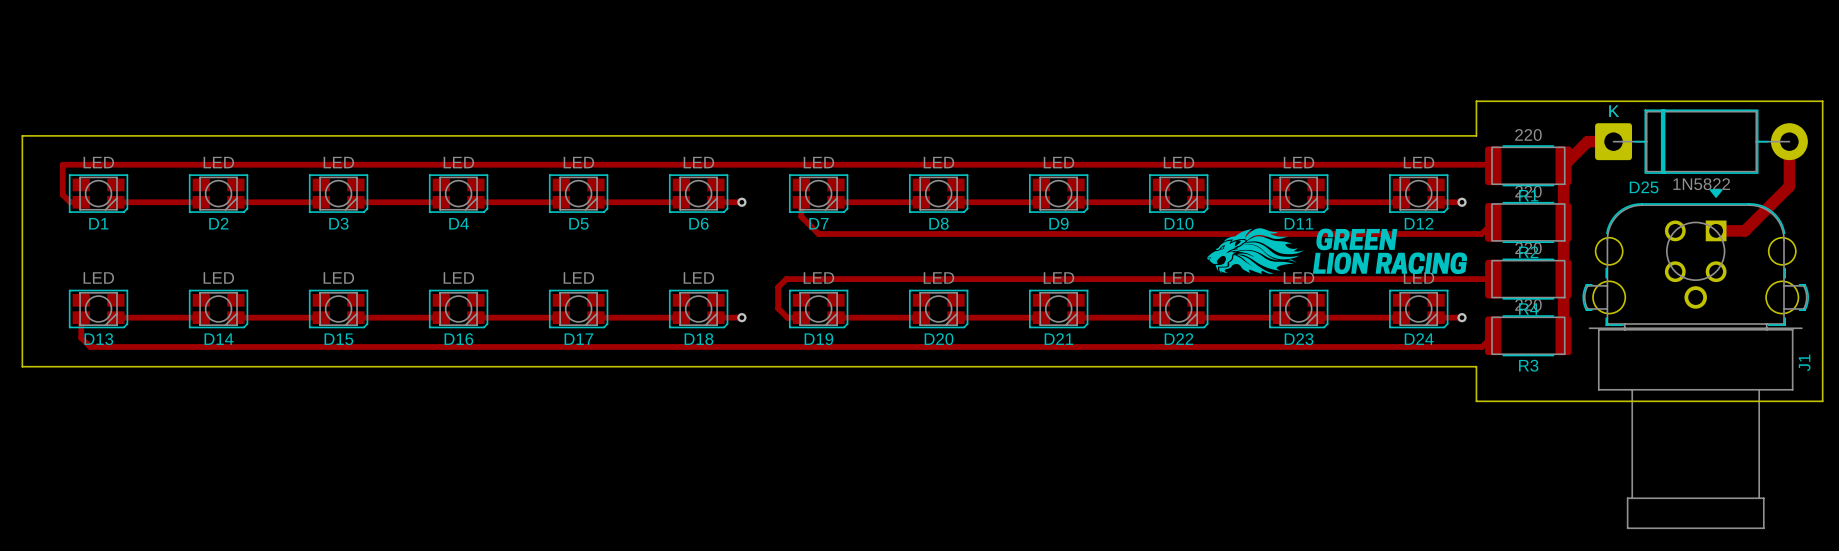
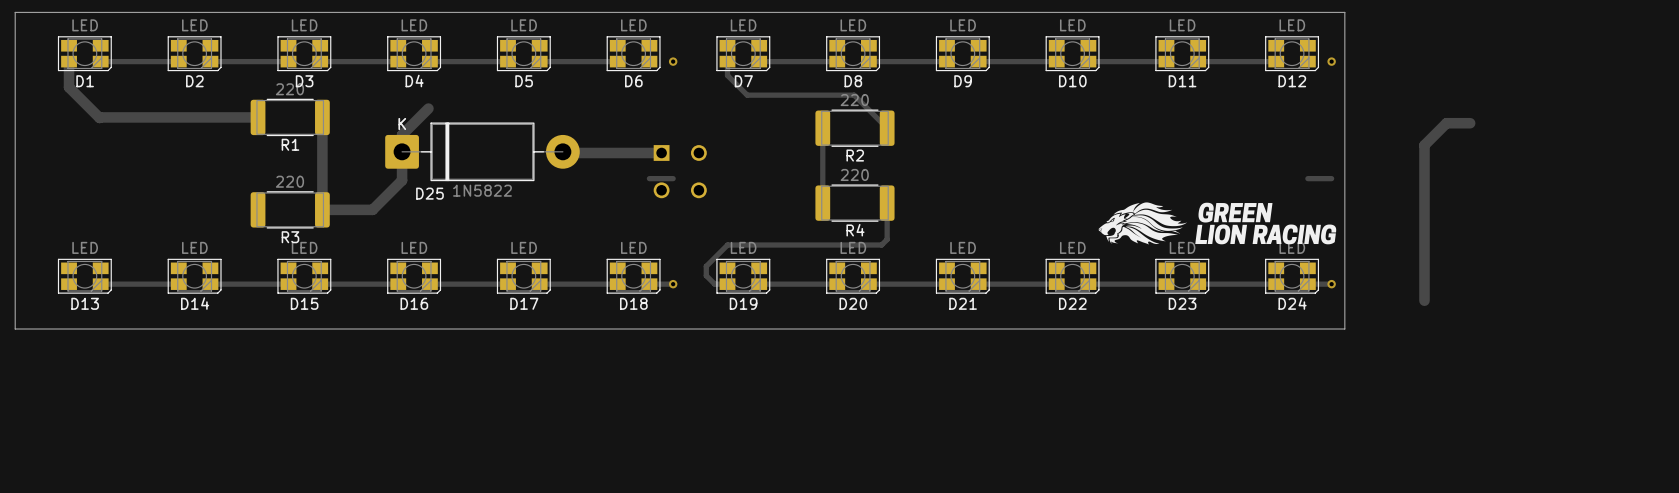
track: none -> (69, 61) (69, 87) (99, 117) (258, 117)
via: none -> (673, 61)
track: none -> (727, 61) (727, 75) (747, 95) (854, 95) (887, 128)
via: none -> (1331, 61)
board edge: (1476, 101) (1822, 101) (1822, 401) (1476, 401) (1476, 366) -> (1344, 117) (1344, 329)
track: none -> (428, 108) (402, 134) (402, 180) (372, 209) (322, 209) (322, 117)
board edge: (22, 135) (1476, 135) -> (15, 117) (15, 12) (1344, 12) (1344, 86)
D25 position: (1701, 141) -> (482, 151)
track: (1789, 141) (1789, 186) (1744, 230) (1716, 230) -> none
track: none -> (822, 128) (822, 203)
track: (1492, 164) (62, 164) (62, 194) (70, 202) (81, 202) -> none
R1 position: (1528, 165) -> (290, 117)
track: none -> (562, 151) (661, 152)
D1 position: (98, 193) -> (84, 53)
D2 position: (218, 193) -> (194, 53)
D3 position: (338, 193) -> (304, 53)
D4 position: (458, 193) -> (414, 53)
D5 position: (578, 193) -> (523, 53)
D6 position: (698, 193) -> (633, 53)
D7 position: (818, 193) -> (743, 53)
D8 position: (938, 193) -> (853, 53)
D9 position: (1058, 193) -> (962, 53)
D10 position: (1178, 193) -> (1072, 53)
D11 position: (1298, 193) -> (1182, 53)
D12 position: (1418, 193) -> (1292, 53)
part: none -> (680, 171)
track: (115, 202) (201, 202) -> (100, 61) (178, 61)
track: (235, 202) (321, 202) -> (210, 61) (288, 61)
track: (355, 202) (441, 202) -> (320, 61) (398, 61)
track: (475, 202) (561, 202) -> (429, 61) (508, 61)
track: (595, 202) (681, 202) -> (539, 61) (617, 61)
via: (741, 202) -> none
track: (801, 202) (801, 216) (818, 233) (1481, 233) (1493, 222) -> none
track: (835, 202) (921, 202) -> (759, 61) (837, 61)
track: (955, 202) (1041, 202) -> (868, 61) (946, 61)
track: (1075, 202) (1161, 202) -> (978, 61) (1056, 61)
track: (1196, 202) (1281, 202) -> (1088, 61) (1166, 61)
track: (1316, 202) (1401, 202) -> (1198, 61) (1276, 61)
via: (1462, 202) -> none
R2 position: (1528, 222) -> (854, 128)
track: (1493, 279) (786, 279) (778, 287) (778, 298) -> (887, 203) (887, 239) (881, 245) (727, 245) (706, 266)
R4 position: (1528, 279) -> (854, 203)
track: (81, 317) (81, 337) (90, 346) (1481, 346) (1493, 335) -> none
R3 position: (1528, 335) -> (290, 209)
J1: (1695, 359) -> none

